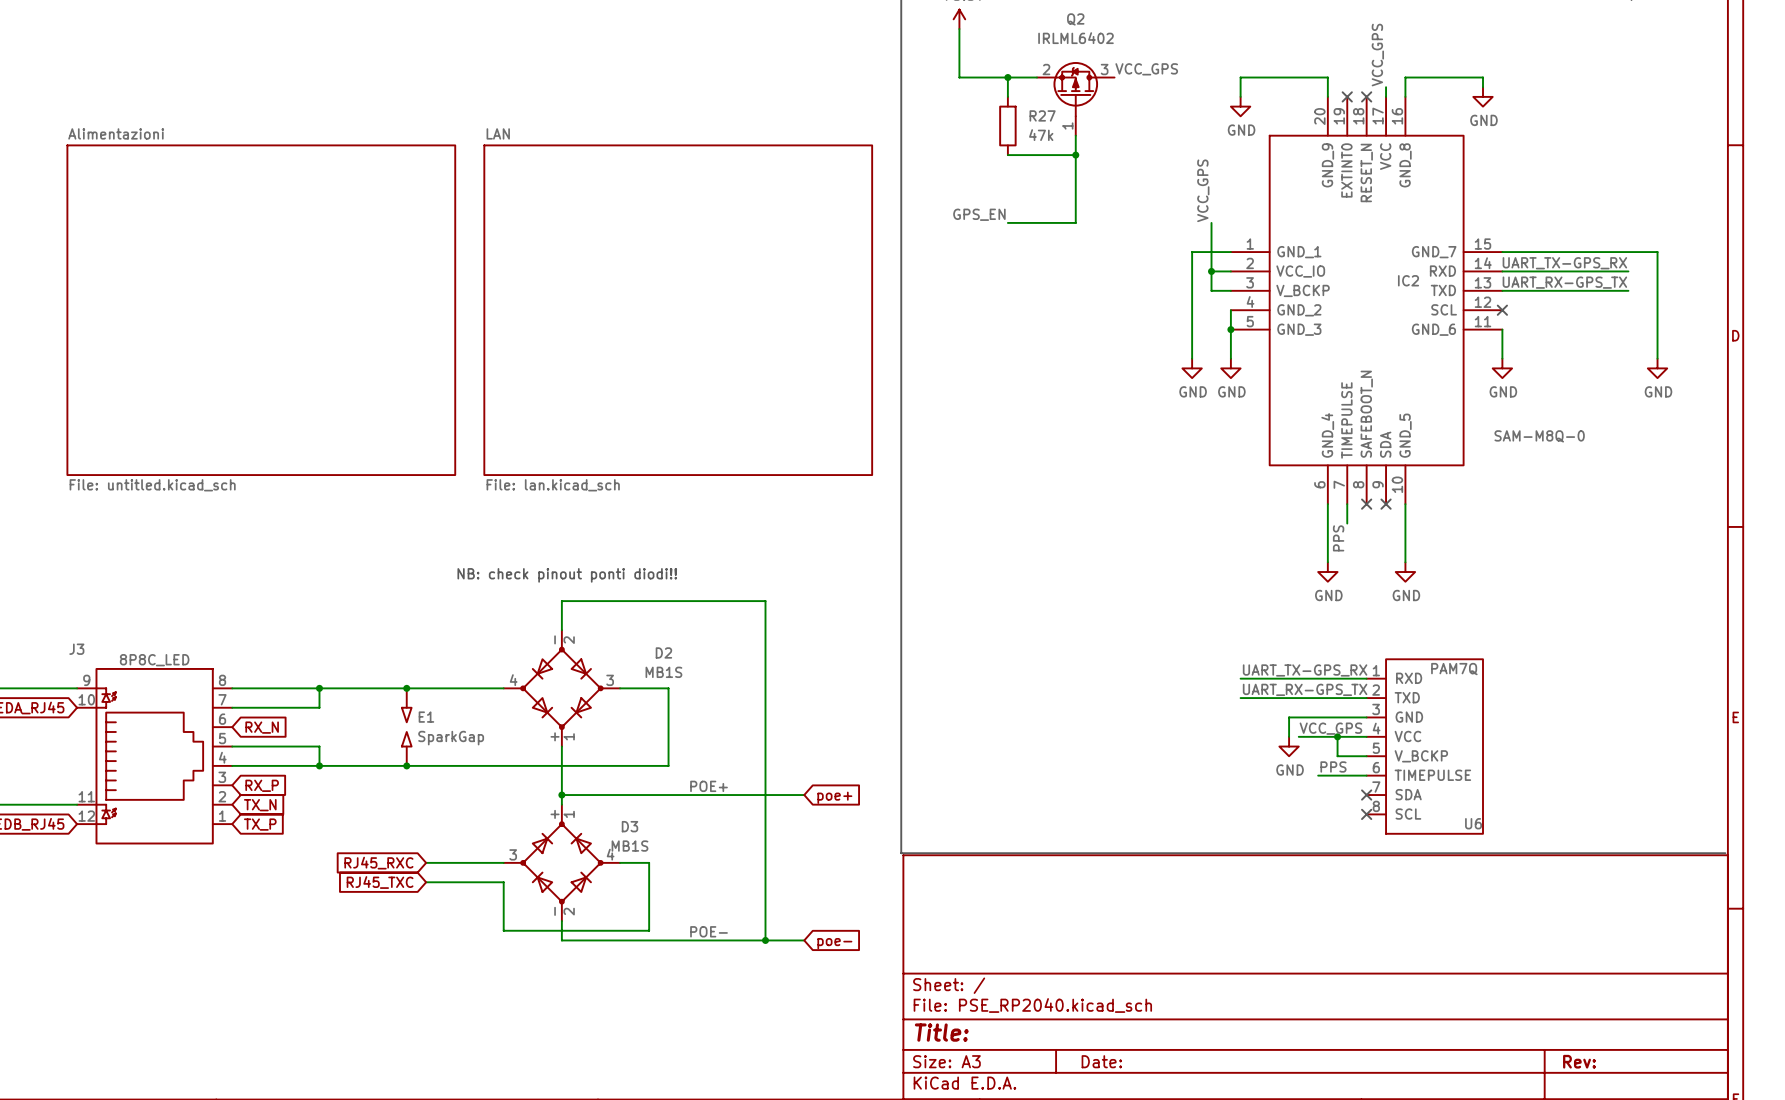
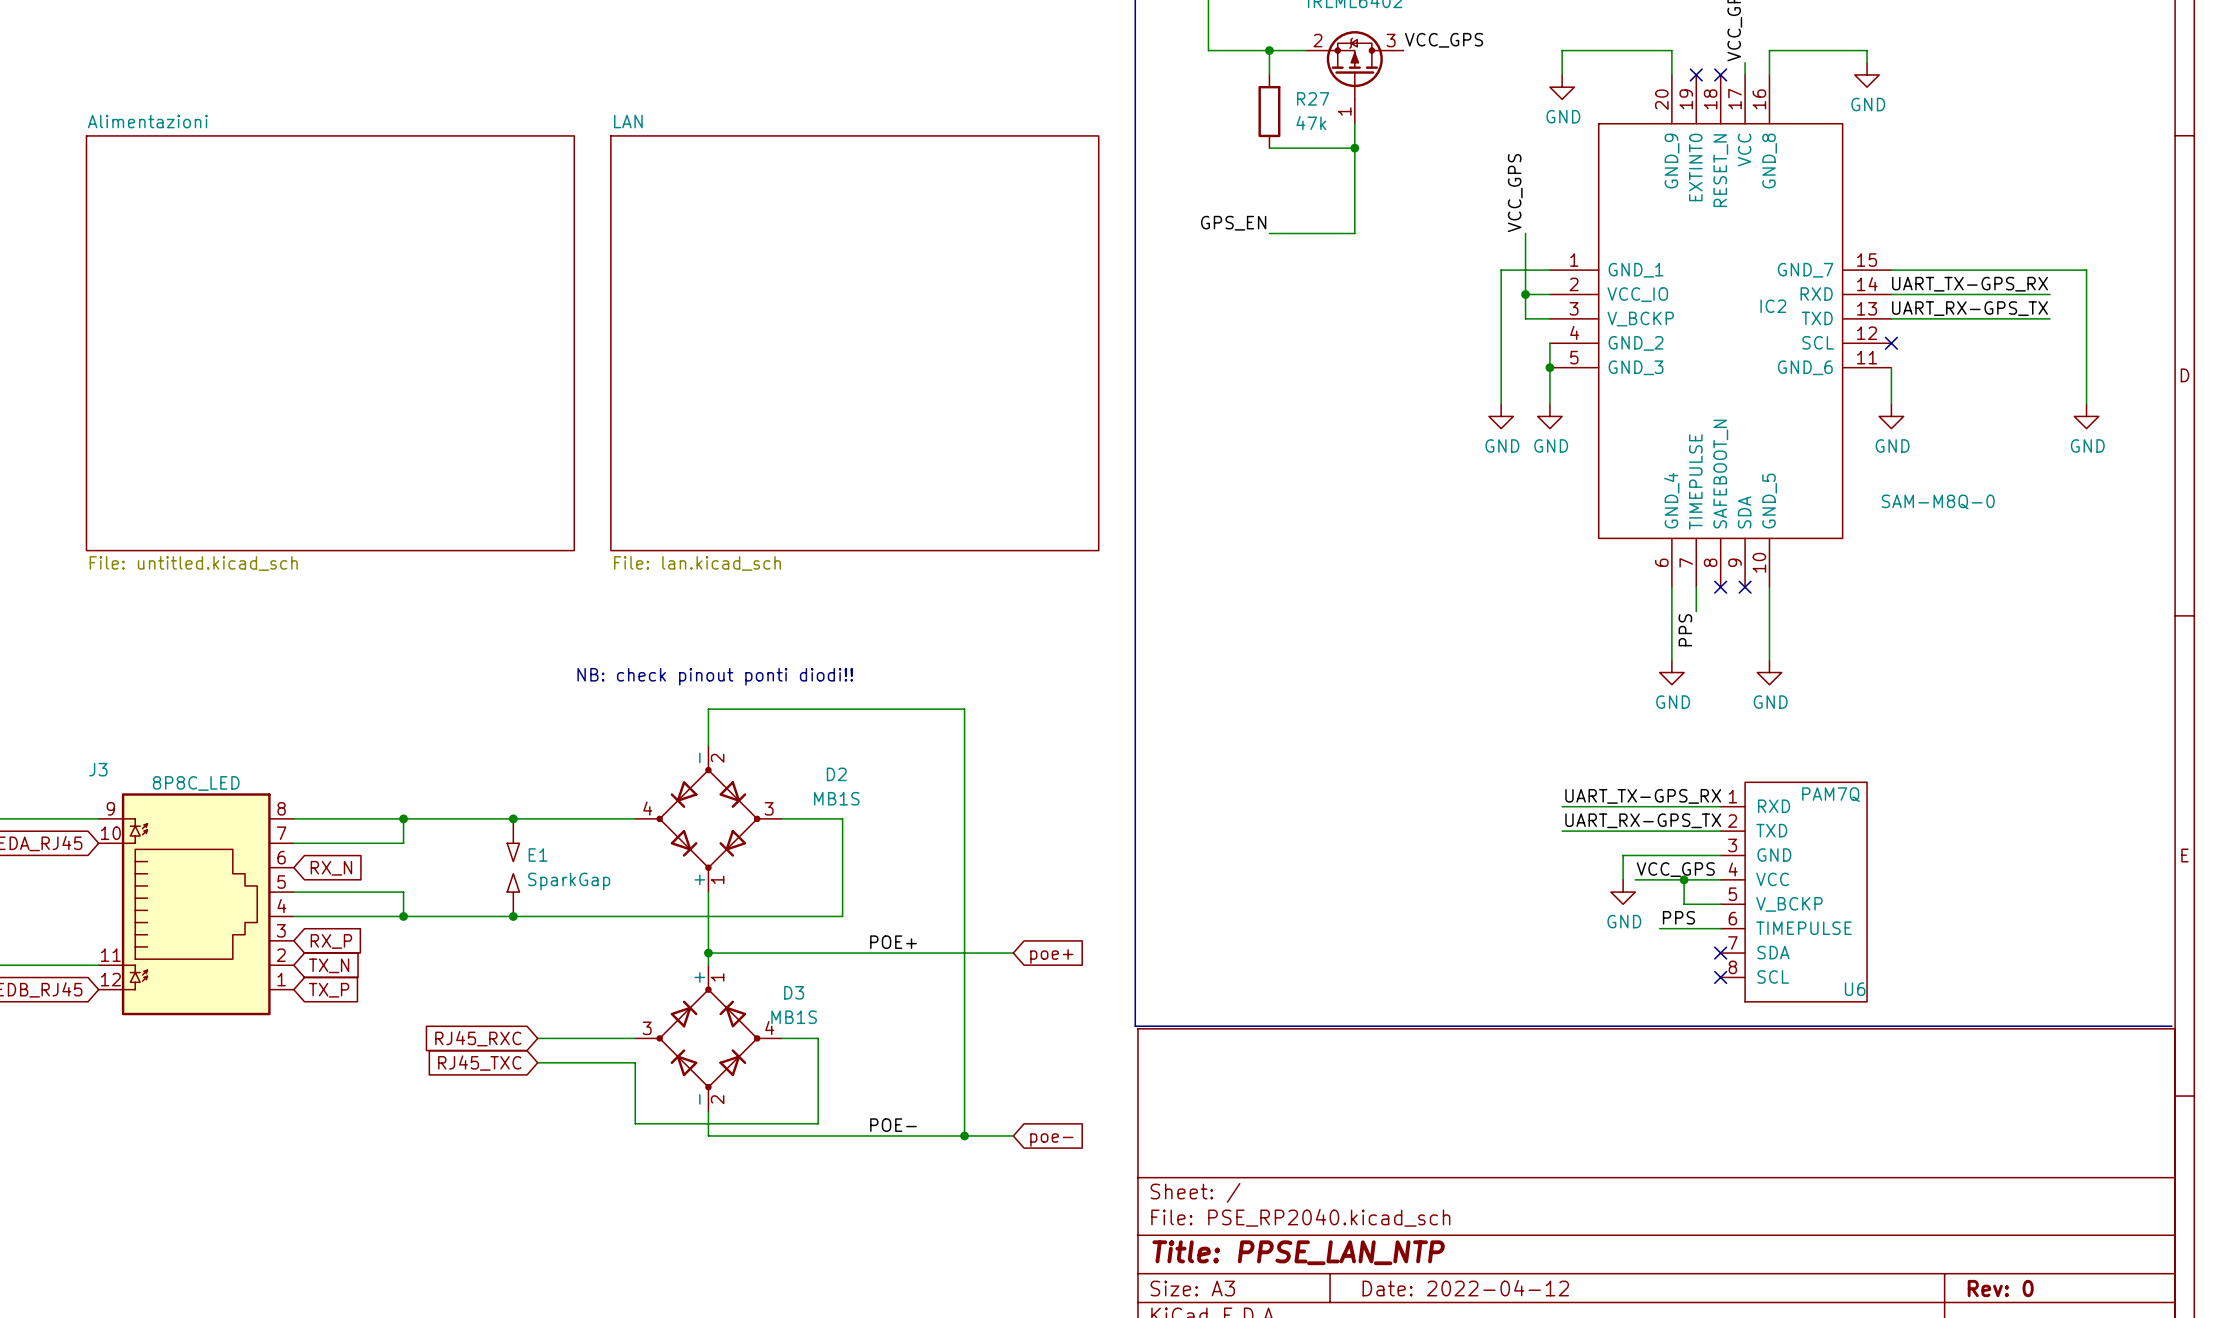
title block: Title: (941, 1032) -> Title: PPSE_LAN_NTP (1298, 1252)
title block: Date: (1101, 1061) -> Date: 2022-04-12 (1465, 1288)
title block: Rev: (1579, 1061) -> Rev: 0 (2000, 1288)

